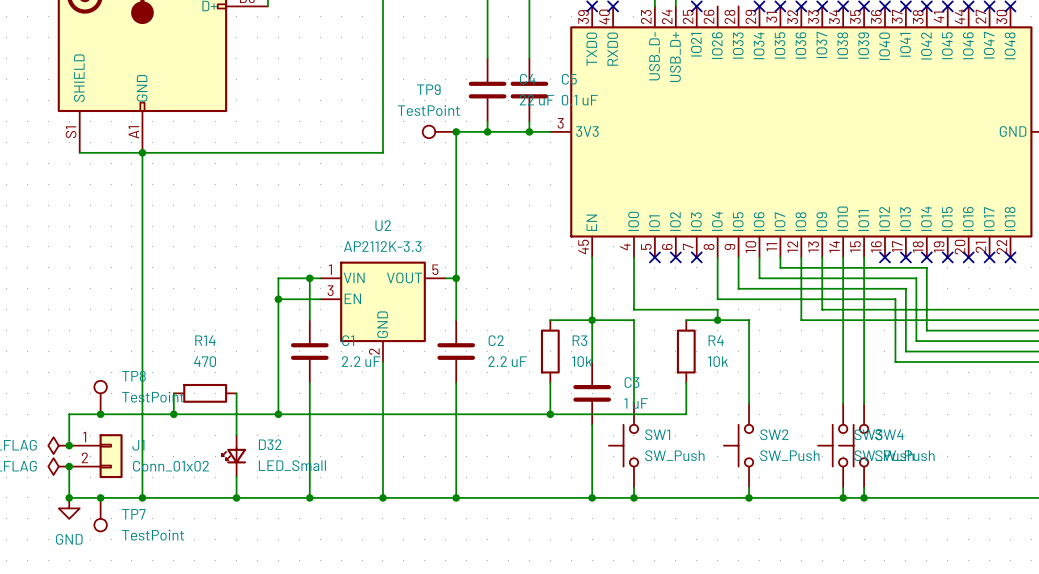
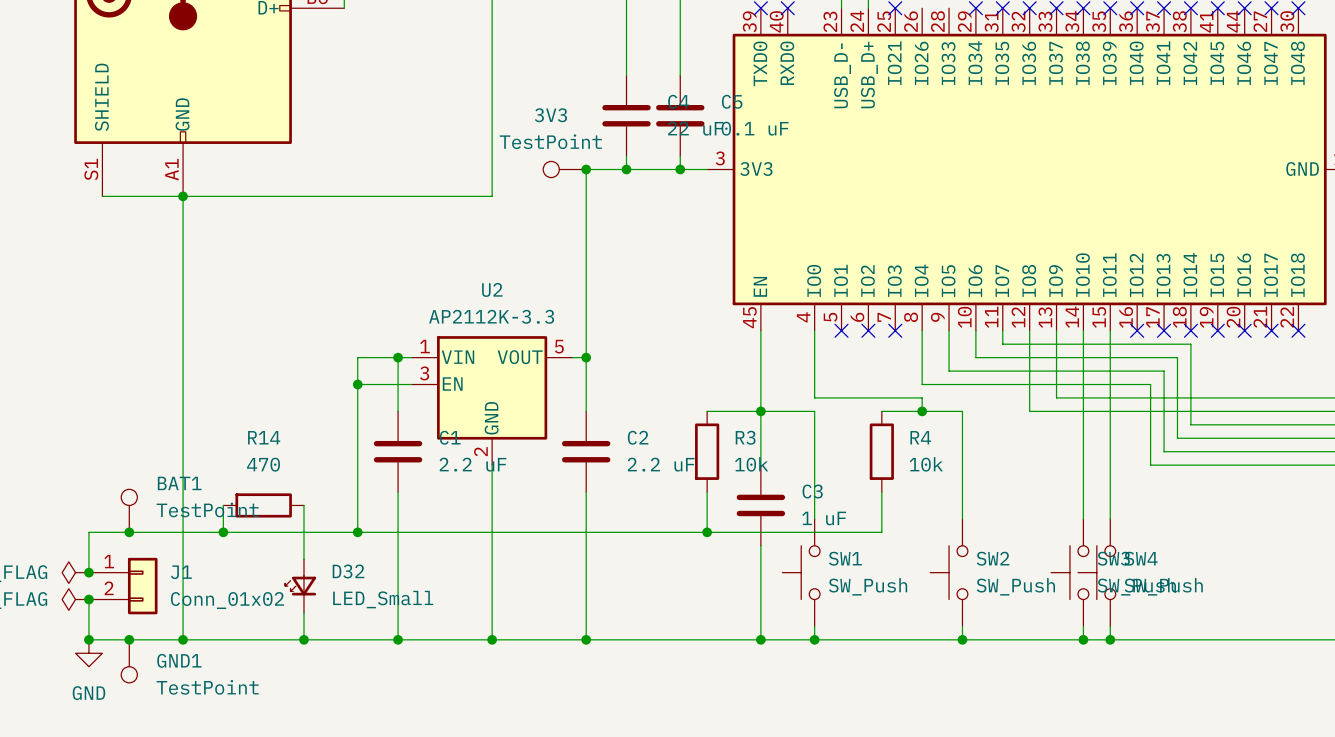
TP9 name: TP9 (428, 89) -> 3V3 (550, 115)
TP8 name: TP8 (133, 376) -> BAT1 (179, 483)
TP7 name: TP7 (133, 514) -> GND1 (179, 660)

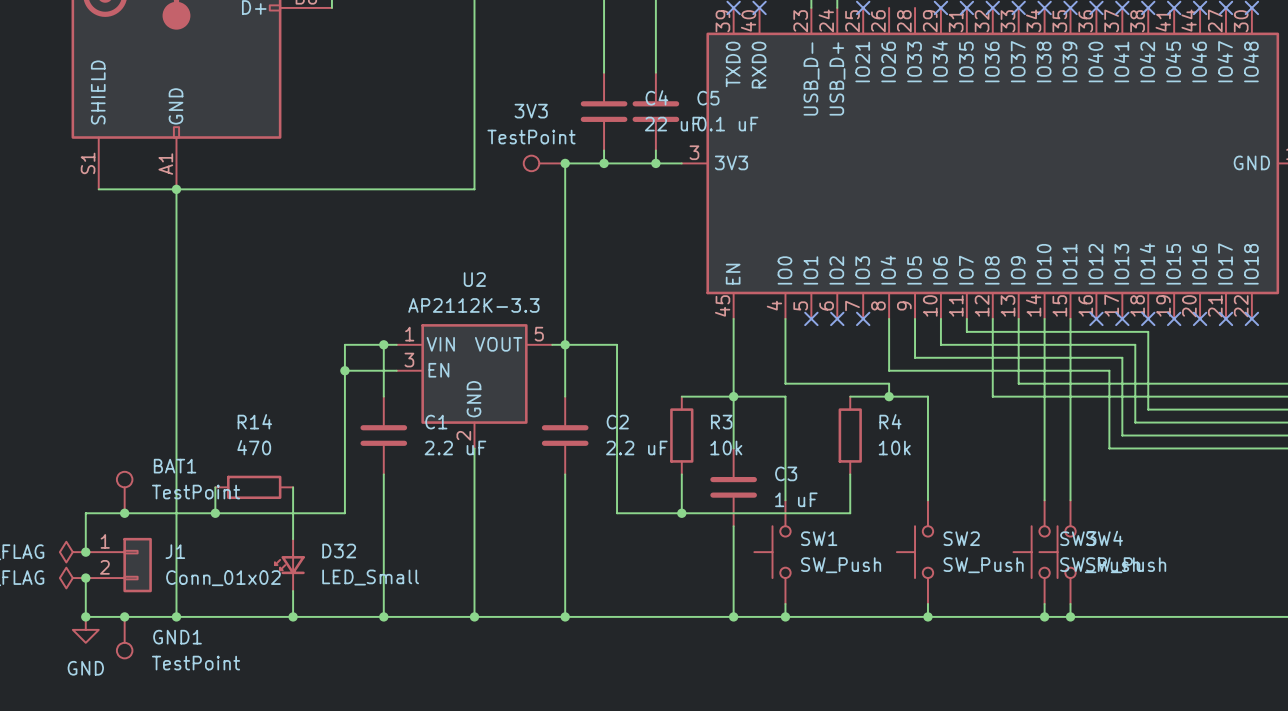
wire: (357, 532) (639, 532) -> (565, 344) (617, 344) (617, 513)
junction: (357, 532) -> none

